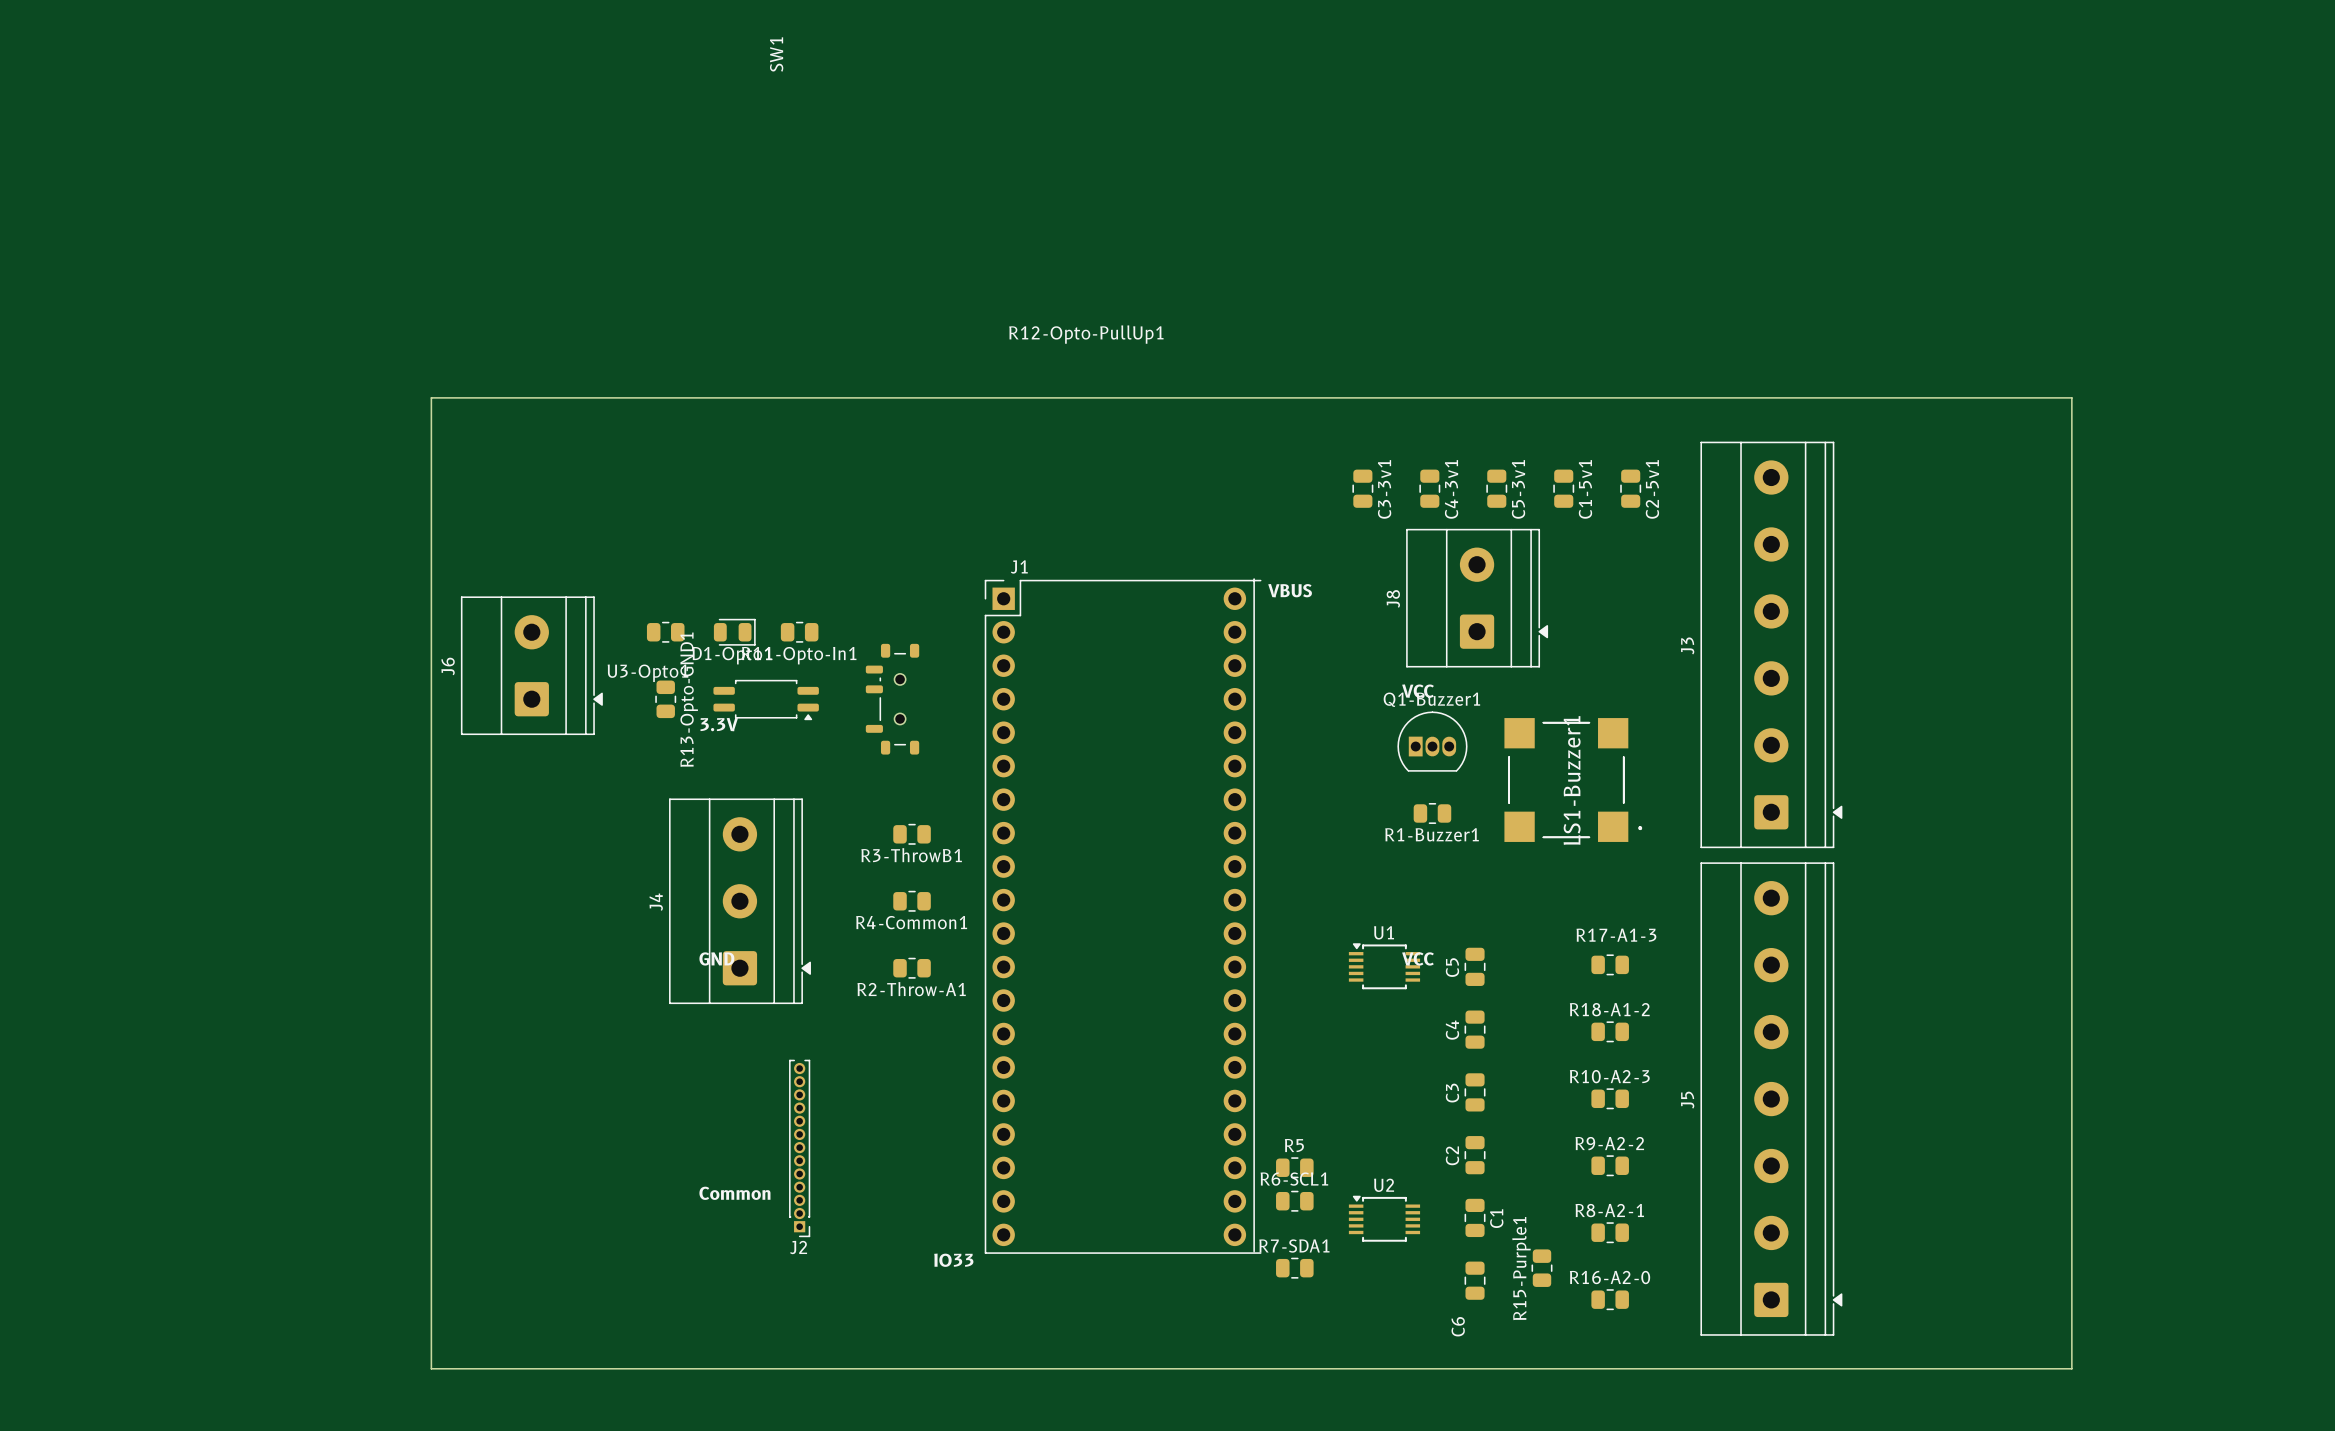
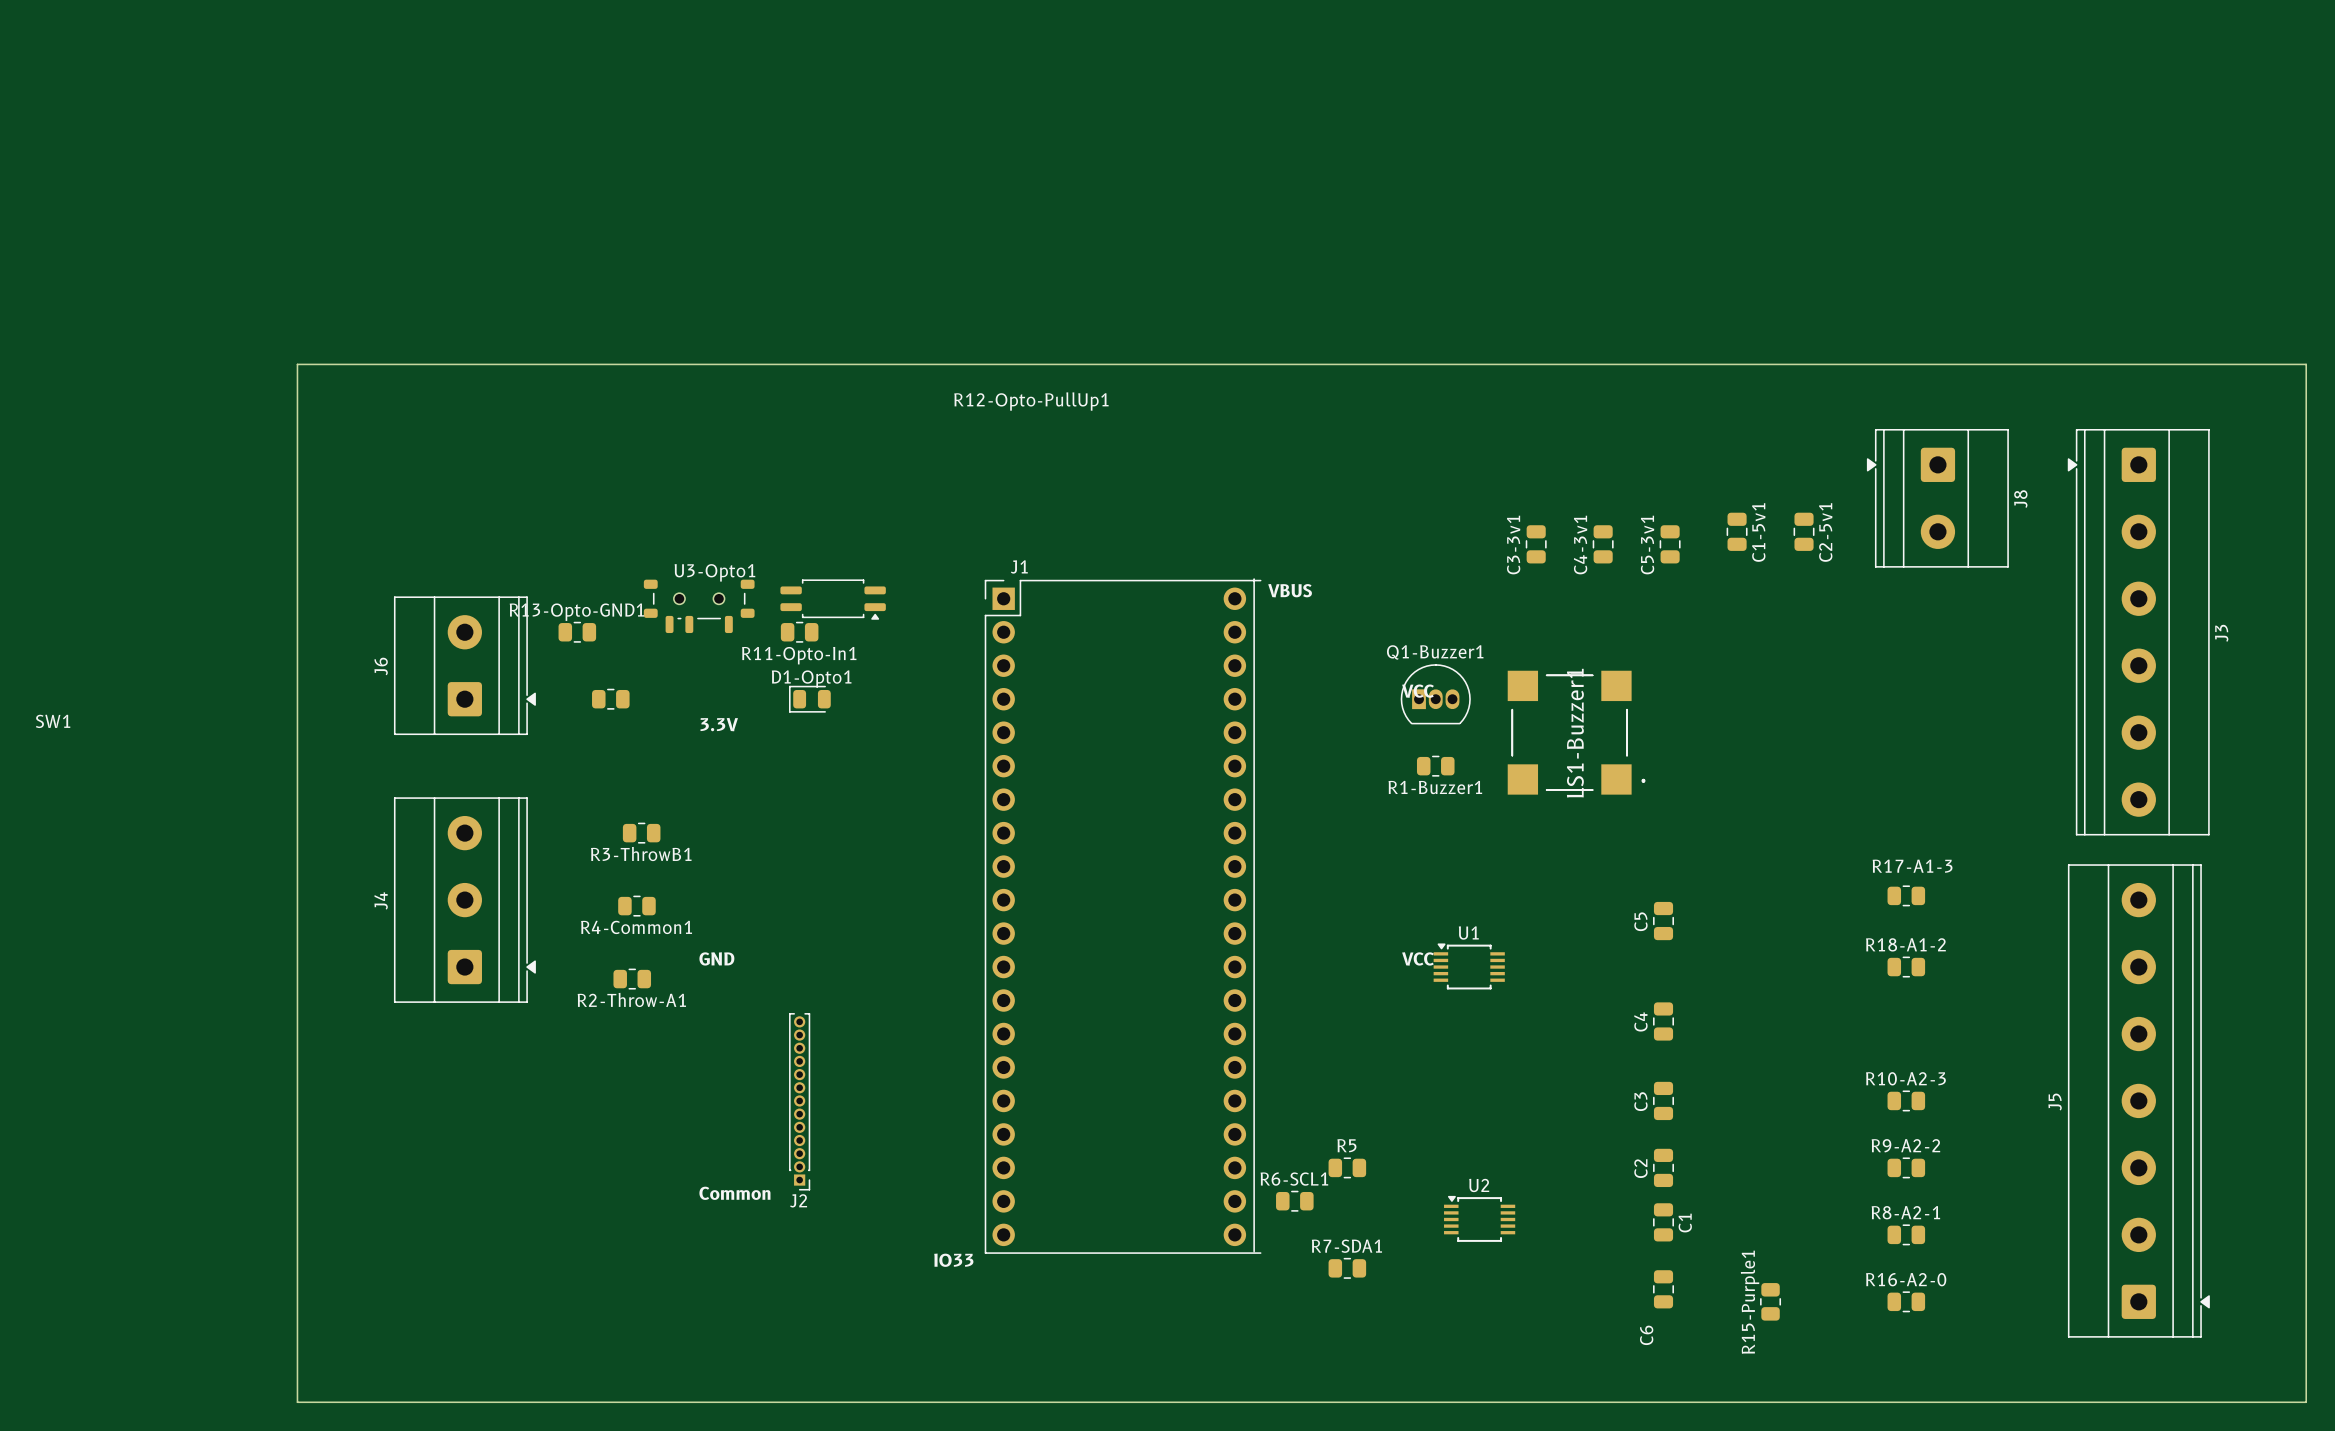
board edge: (431, 397) (2071, 397) (2071, 1368) (431, 1368) (431, 397) -> (297, 364) (297, 1402) (2306, 1402) (2306, 364) (297, 364)
C3-3v1 position: (1362, 488) -> (1536, 544)
C4-3v1 position: (1429, 488) -> (1603, 544)
C5-3v1 position: (1496, 488) -> (1670, 544)
C1-5v1 position: (1563, 488) -> (1737, 531)
C2-5v1 position: (1630, 488) -> (1804, 531)
C3-3v1 name position: C3-3v1 (1384, 489) -> C3-3v1 (1513, 545)
C4-3v1 name position: C4-3v1 (1451, 489) -> C4-3v1 (1580, 545)
C5-3v1 name position: C5-3v1 (1518, 489) -> C5-3v1 (1647, 545)
J8 rotation: 0° (1477, 598) -> 180° (1937, 498)
J8 position: (1477, 598) -> (1937, 498)
R12-Opto-PullUp1 position: (665, 632) -> (610, 699)
D1-Opto1 rotation: 0° (734, 632) -> 180° (809, 699)
D1-Opto1 position: (734, 632) -> (809, 699)
J3 rotation: 0° (1771, 644) -> 180° (2138, 632)
J3 position: (1771, 644) -> (2138, 632)
J6 position: (531, 665) -> (464, 665)
R13-Opto-GND1 rotation: 0° (665, 699) -> 90° clockwise (577, 632)
R13-Opto-GND1 position: (665, 699) -> (577, 632)
R13-Opto-GND1 name position: R13-Opto-GND1 (689, 699) -> R13-Opto-GND1 (576, 612)
SW1 rotation: 0° (892, 699) -> 90° counterclockwise (699, 606)
SW1 position: (892, 699) -> (699, 606)
U3-Opto1 position: (766, 700) -> (833, 599)
Q1-Buzzer1 position: (1432, 741) -> (1435, 694)
LS1-Buzzer1 position: (1573, 780) -> (1576, 732)
R1-Buzzer1 position: (1432, 813) -> (1435, 766)
R3-ThrowB1 position: (912, 834) -> (641, 833)
J4 position: (740, 901) -> (464, 900)
R4-Common1 position: (912, 901) -> (636, 906)
R17-A1-3 position: (1610, 964) -> (1906, 895)
U1 position: (1384, 966) -> (1469, 966)
C5 position: (1475, 966) -> (1663, 921)
R2-Throw-A1 position: (912, 968) -> (632, 979)
C4 position: (1475, 1029) -> (1663, 1021)
R18-A1-2 position: (1610, 1031) -> (1906, 967)
C3 position: (1475, 1092) -> (1663, 1100)
R10-A2-3 position: (1610, 1098) -> (1906, 1100)
J5 position: (1771, 1099) -> (2138, 1100)
J2 position: (799, 1148) -> (799, 1101)
C2 position: (1475, 1155) -> (1663, 1167)
R9-A2-2 position: (1610, 1165) -> (1906, 1167)
R5 position: (1294, 1167) -> (1347, 1167)
C1 position: (1475, 1217) -> (1663, 1222)
U2 position: (1384, 1218) -> (1479, 1218)
R8-A2-1 position: (1610, 1232) -> (1906, 1234)
R7-SDA1 position: (1294, 1268) -> (1347, 1268)
R15-Purple1 position: (1541, 1268) -> (1770, 1301)
C6 position: (1475, 1280) -> (1663, 1289)
R16-A2-0 position: (1610, 1299) -> (1906, 1301)

